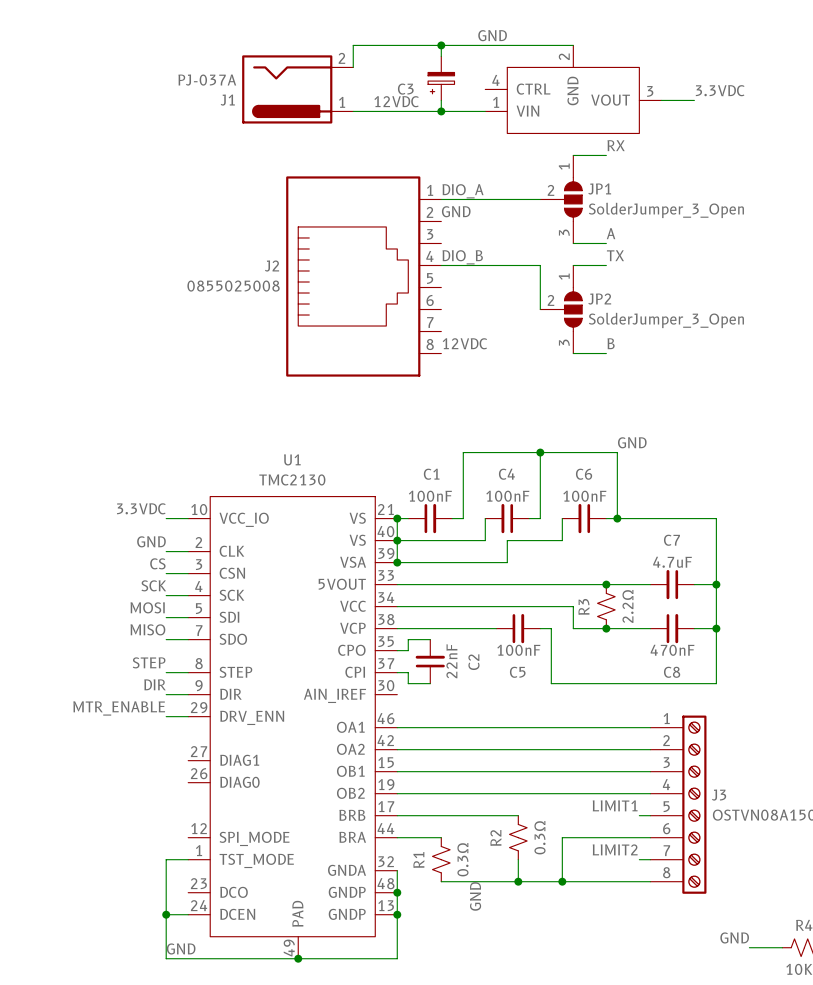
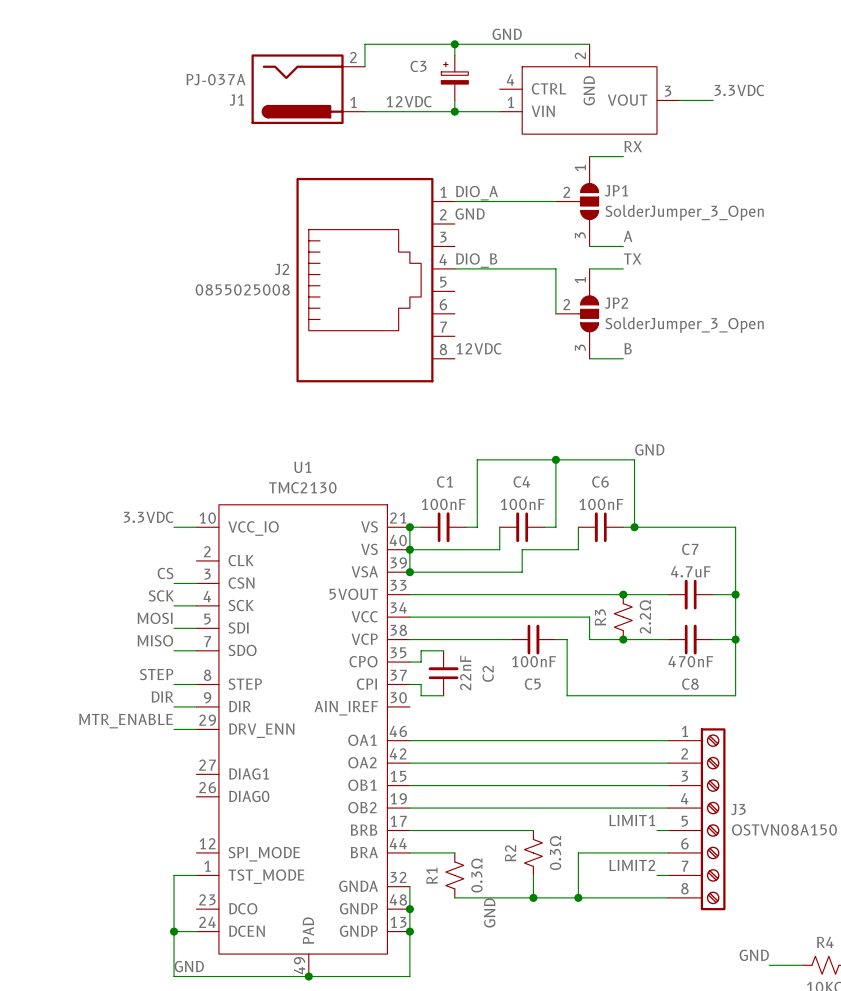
C3 flip: as is (441, 83) -> up-down (454, 73)
label: GND (151, 541) -> none
wire: (166, 551) (188, 551) -> none

